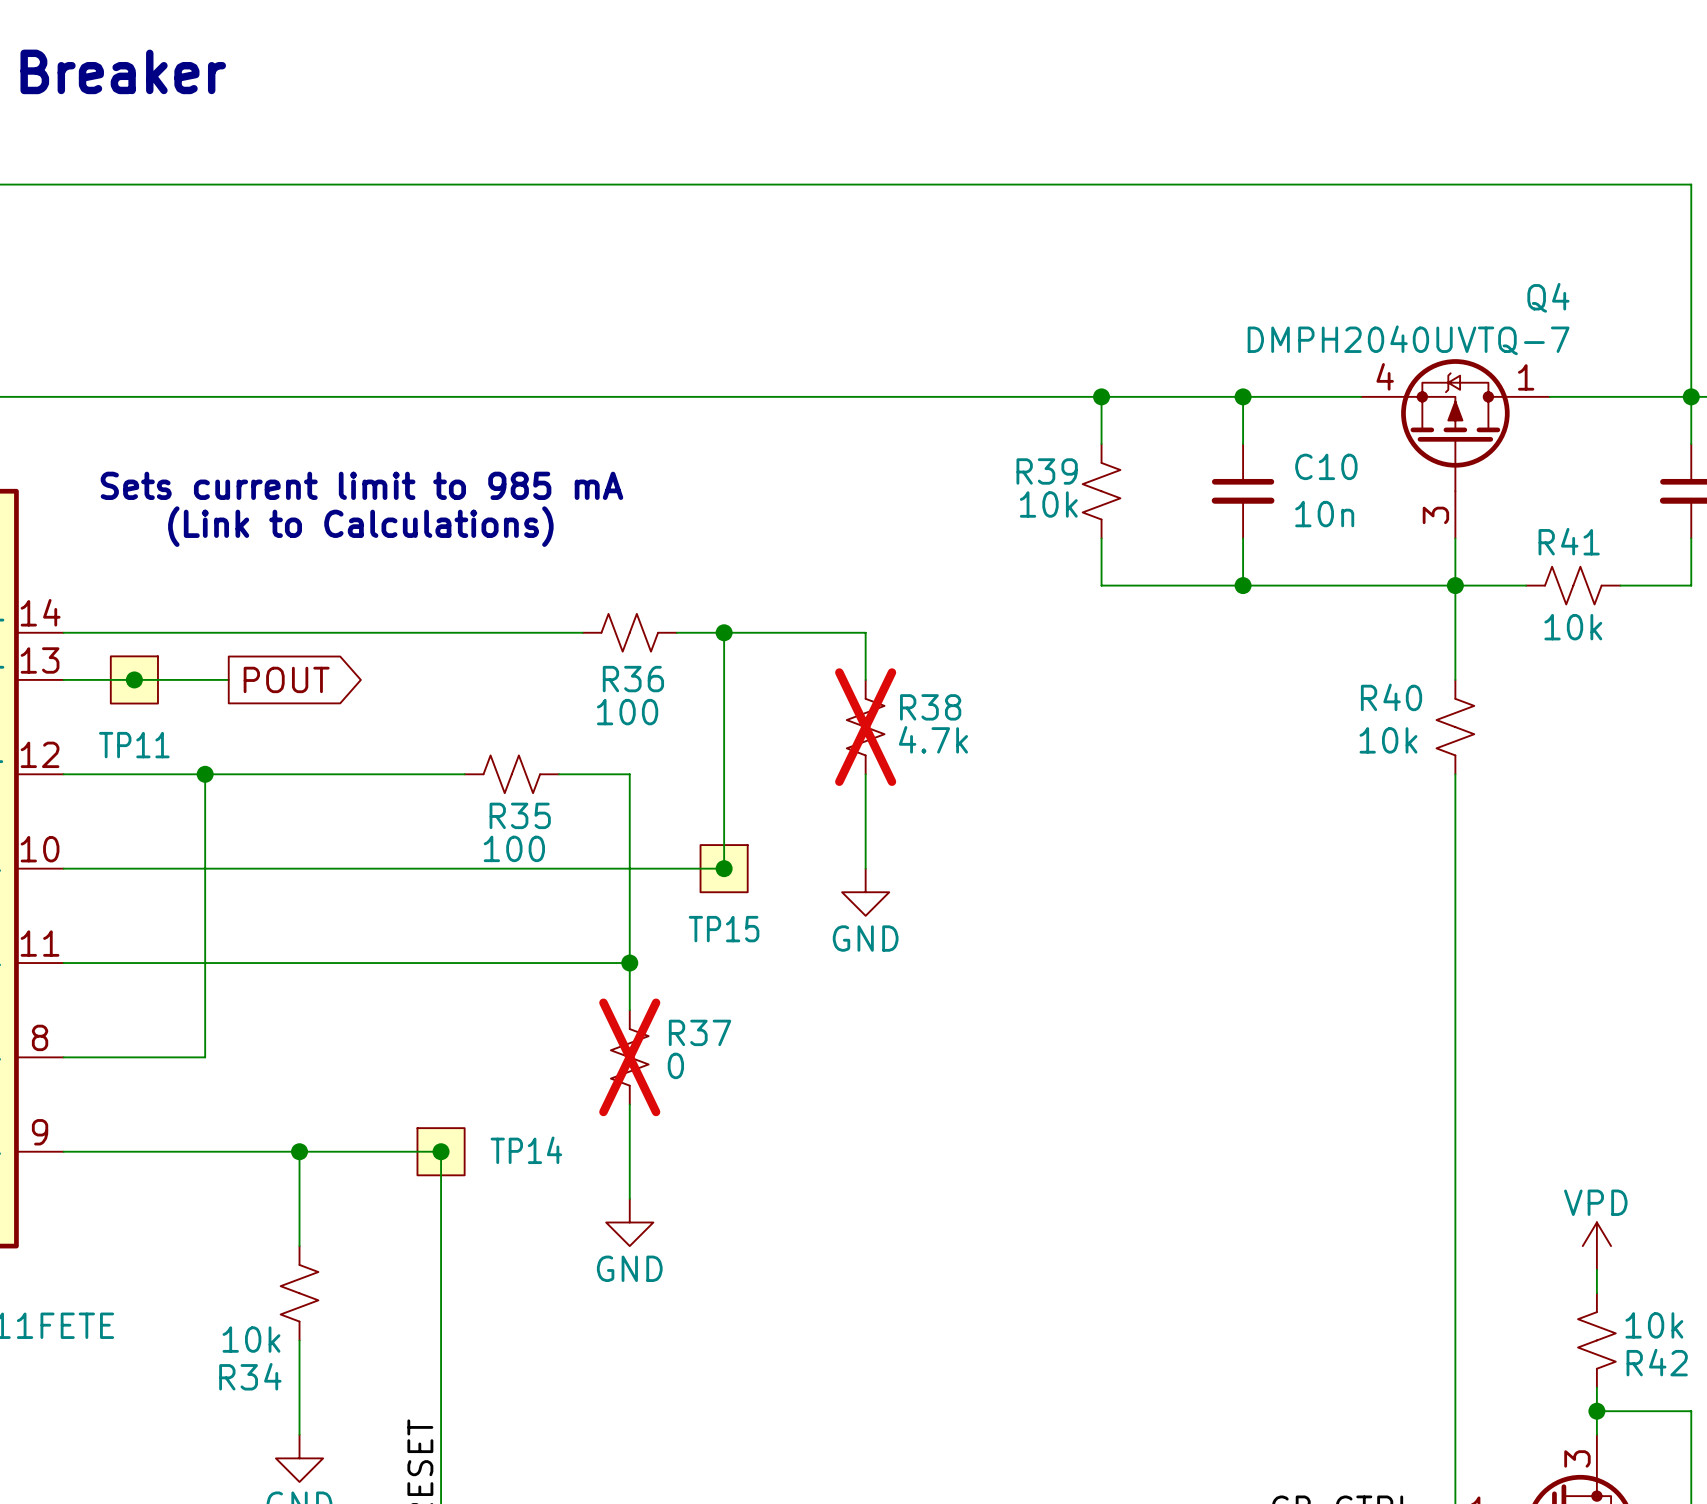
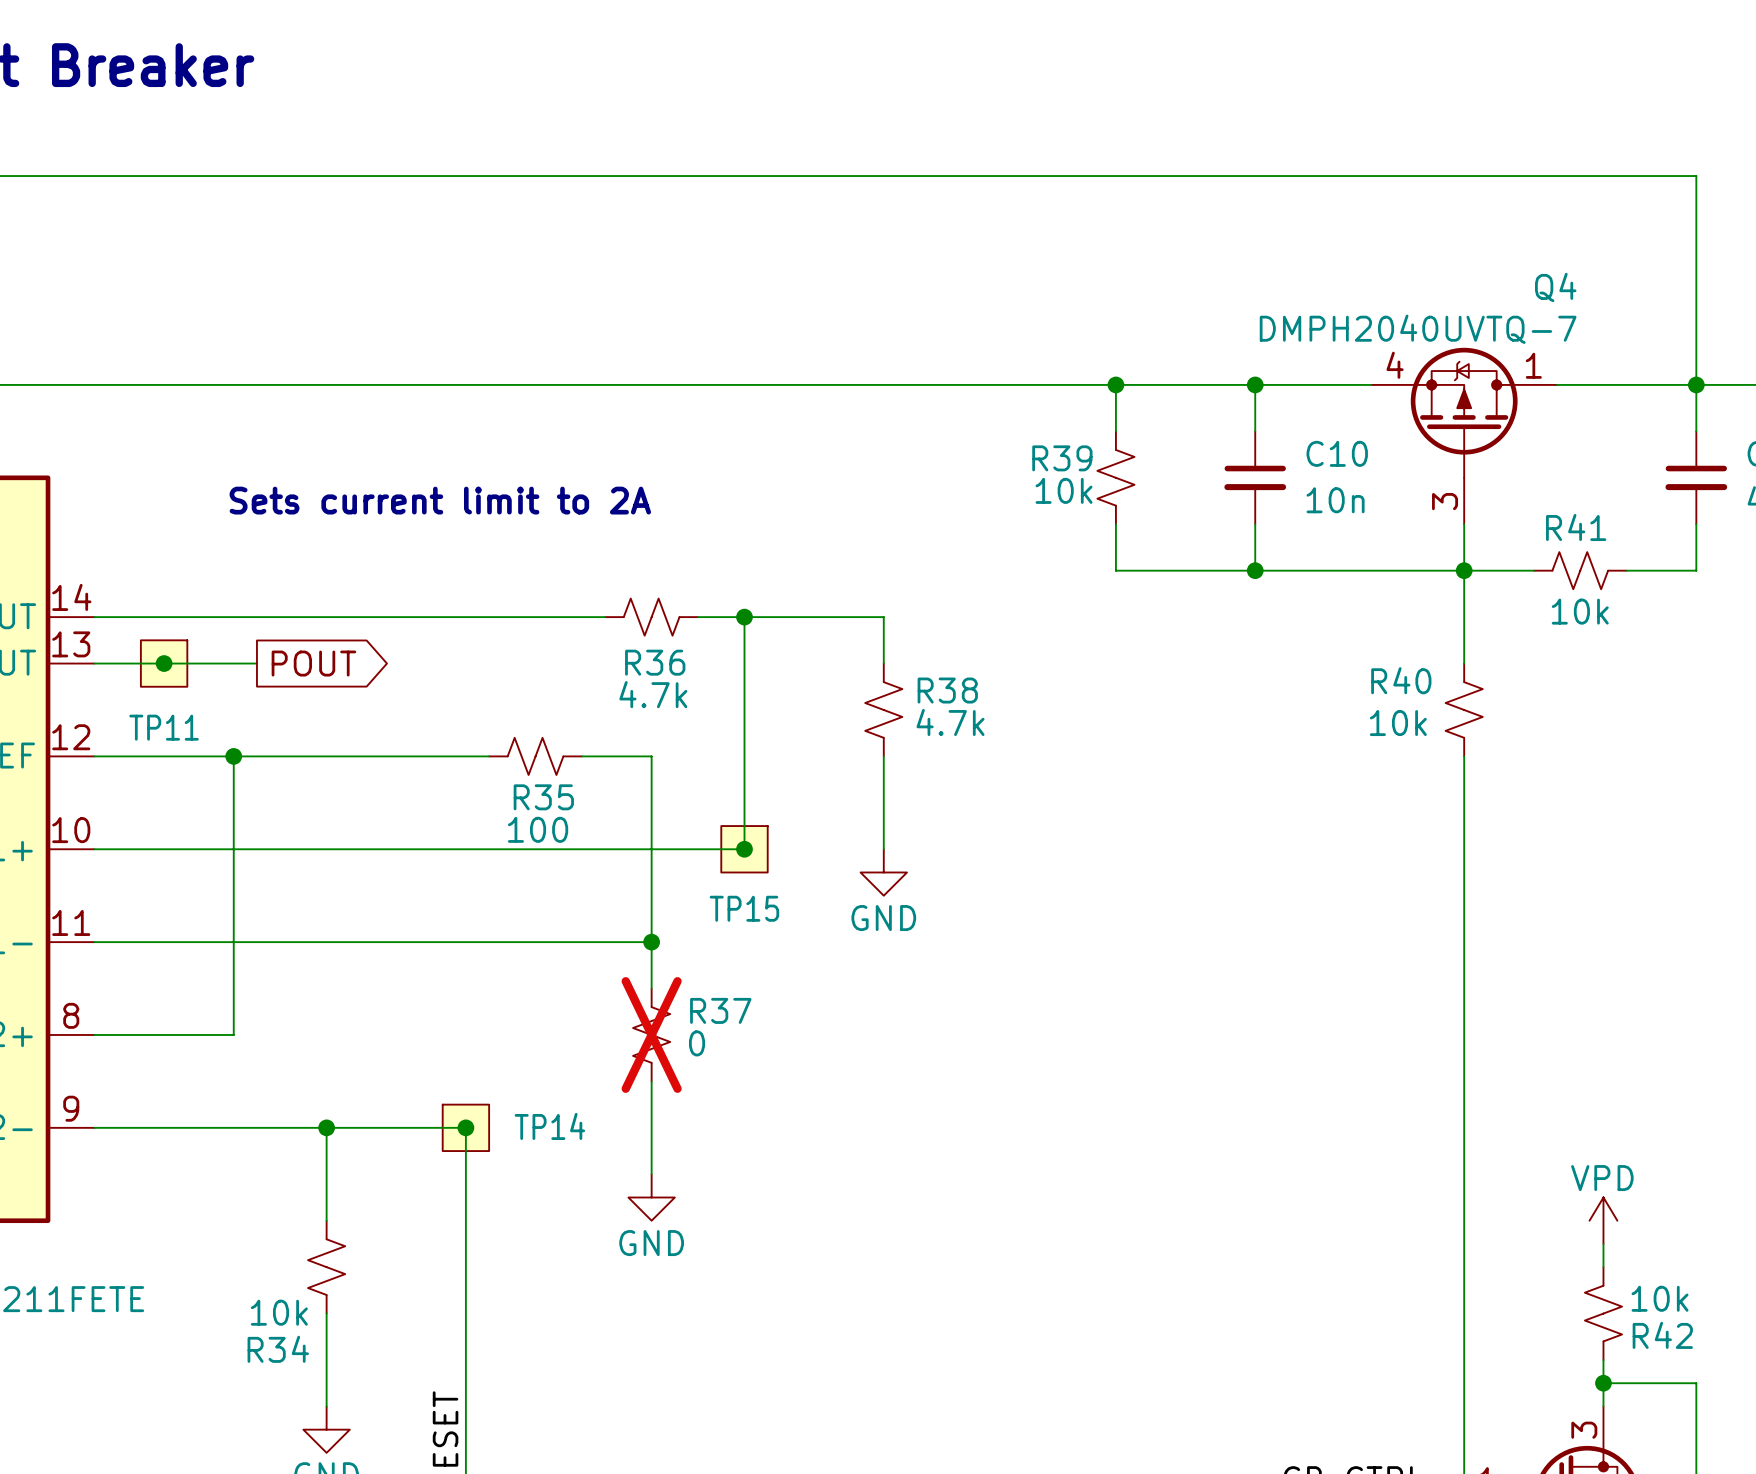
text: Sets current limit to 985 mA (361, 485) -> Sets current limit to 2A (440, 500)
text: (Link to Calculations) (360, 526) -> none
R36 value: 100 (627, 712) -> 4.7k (653, 694)
R38 do-not-place cross: (865, 727) -> none

